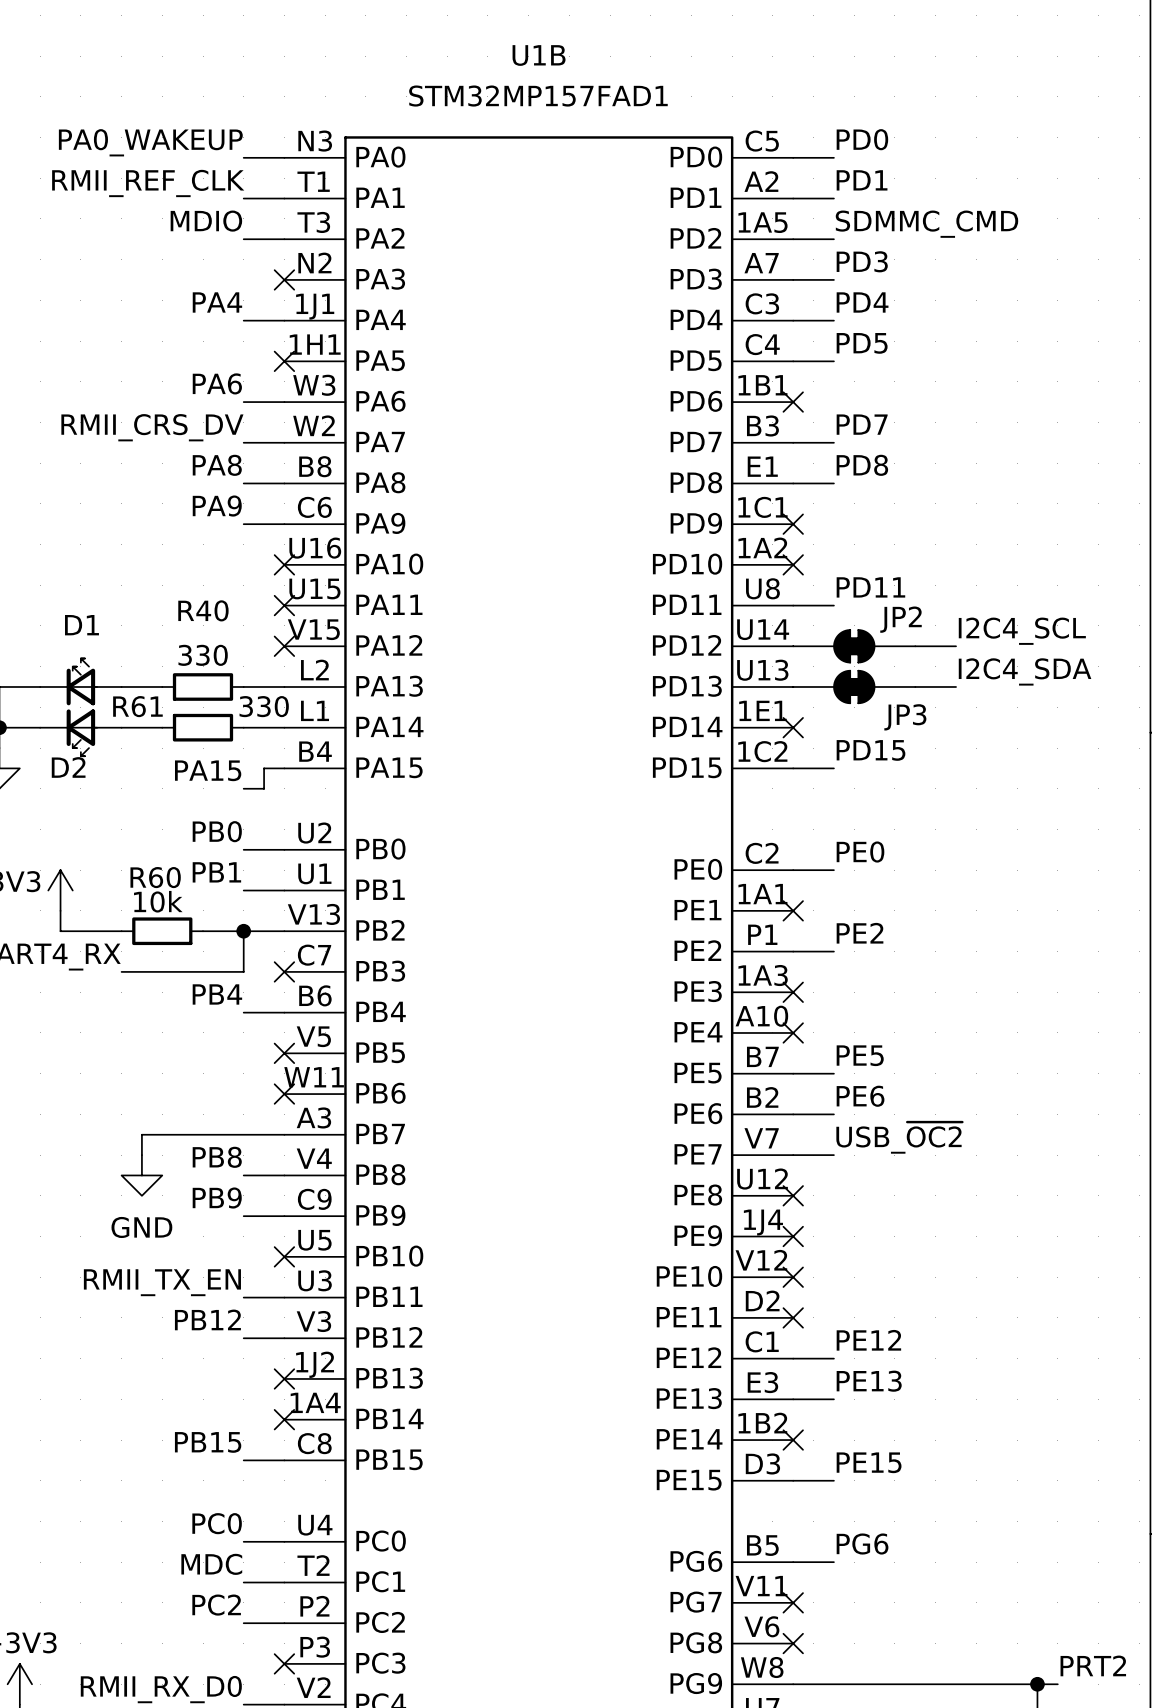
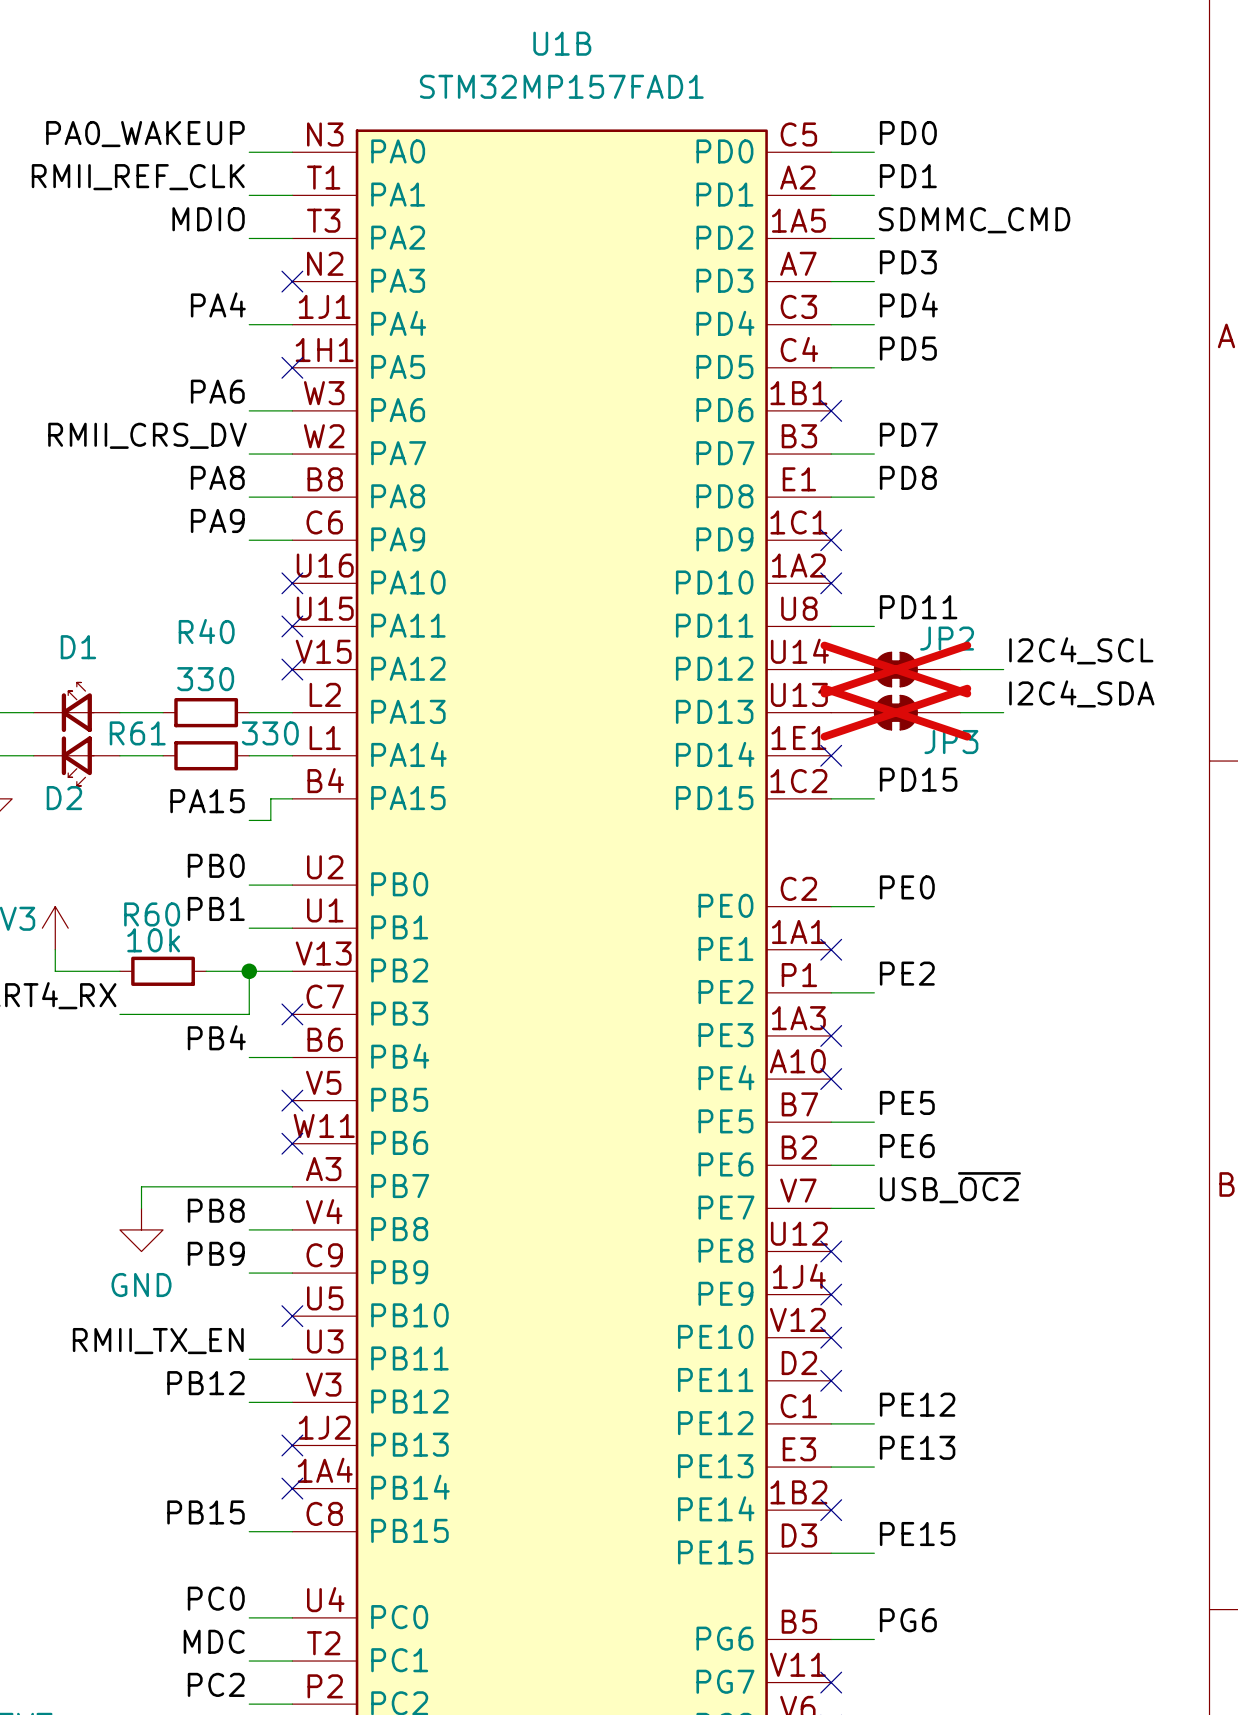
JP2 do-not-place cross: none -> (895, 669)
JP3 do-not-place cross: none -> (895, 712)

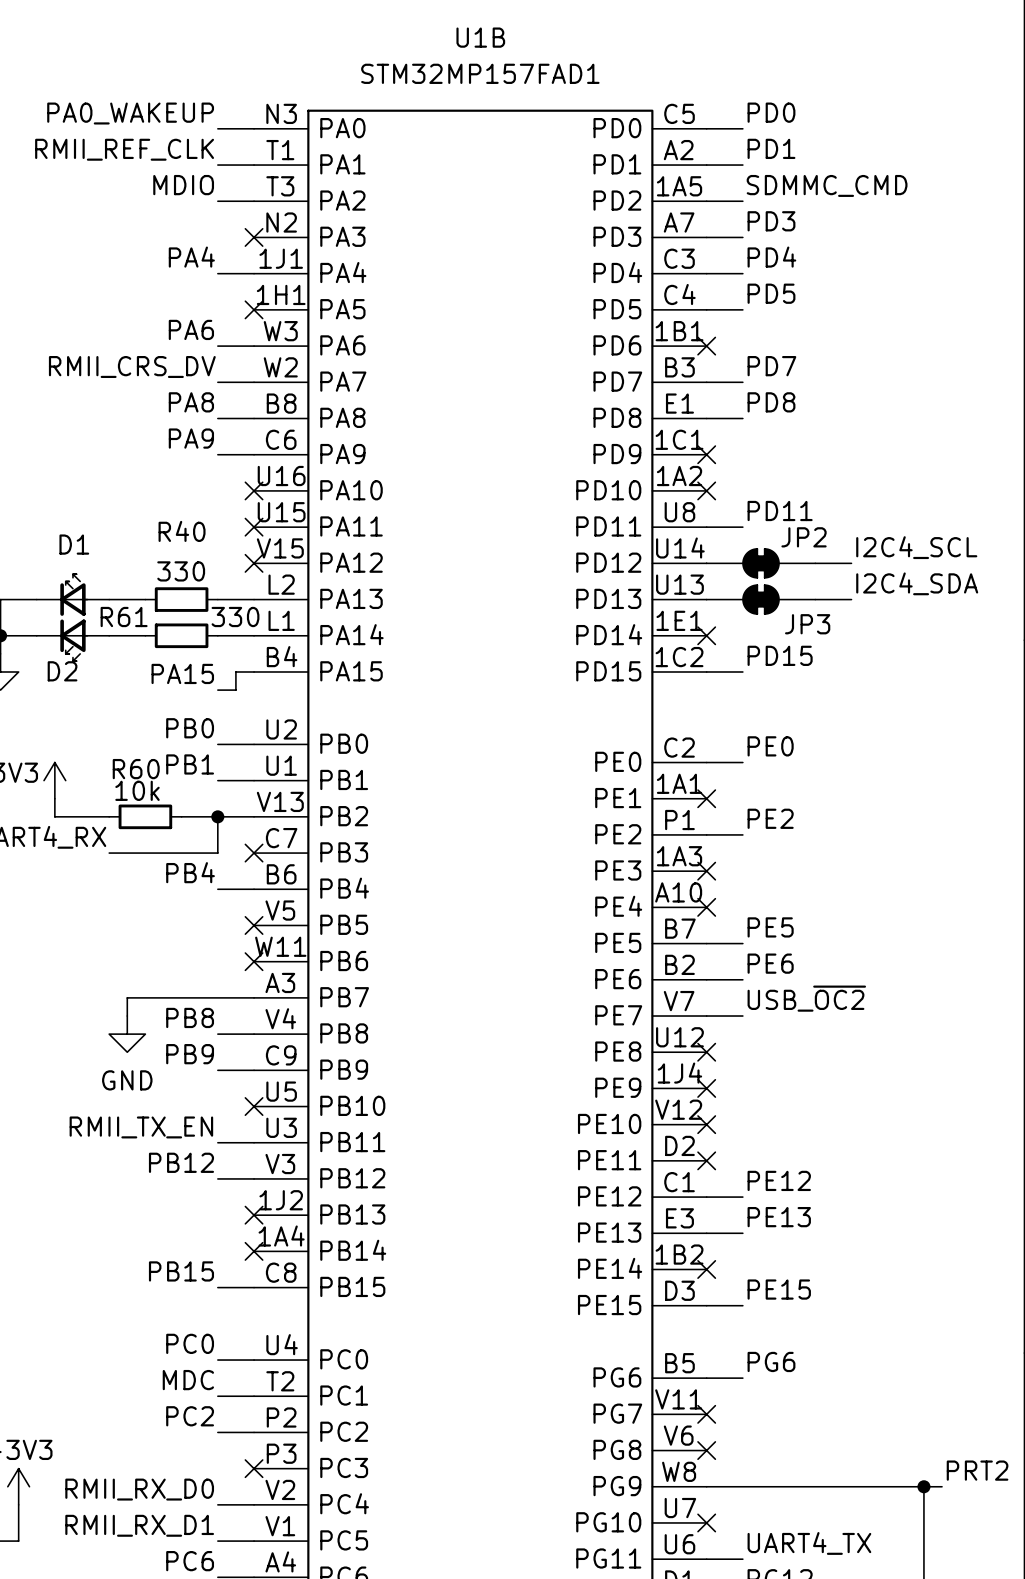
JP2 do-not-place cross: (895, 669) -> none
JP3 do-not-place cross: (895, 712) -> none

